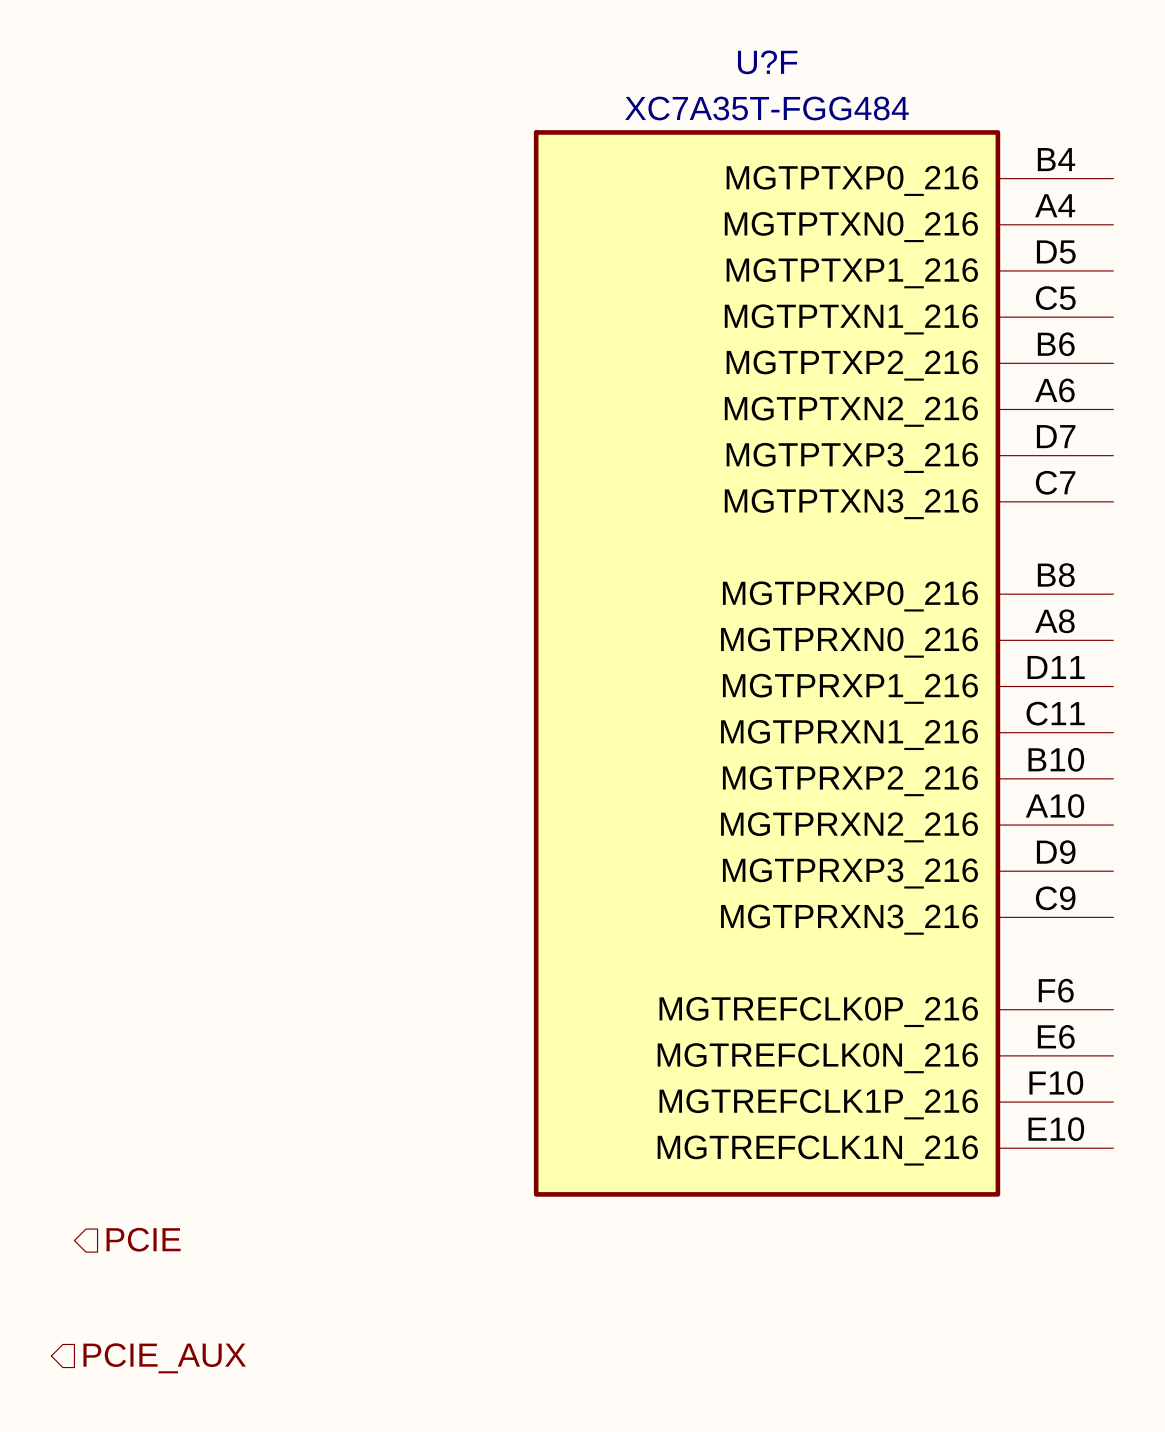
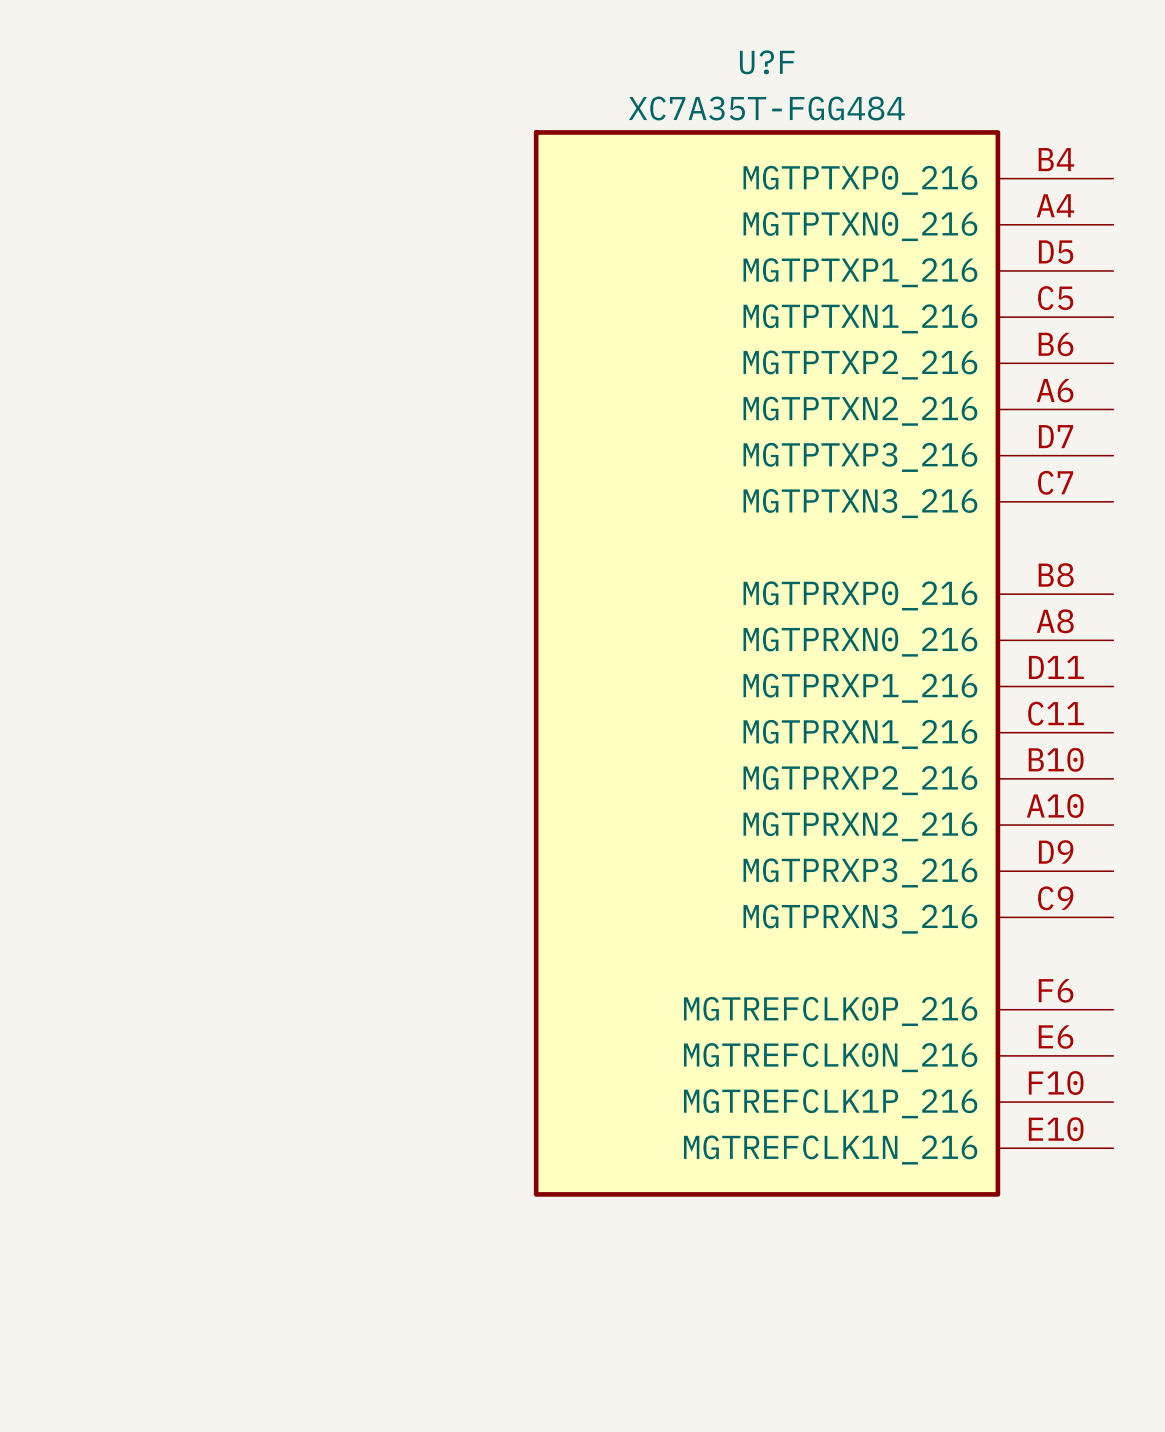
hierarchical label: PCIE (143, 1239) -> none
hierarchical label: PCIE_AUX (164, 1358) -> none

